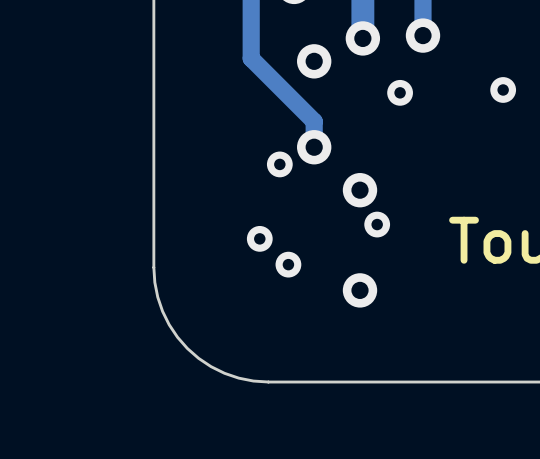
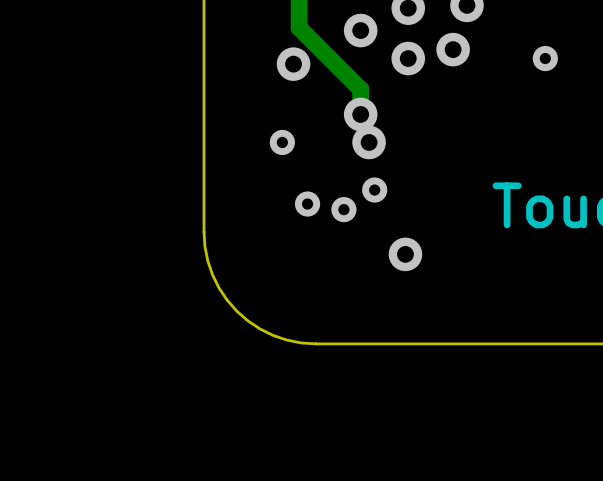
via size: [387, 79, 413, 106] -> [436, 32, 470, 67]
via: none -> (408, 58)
via: none -> (293, 64)
via: (279, 164) -> none
via: none -> (282, 142)
via position: (360, 190) -> (369, 142)
via: none -> (374, 190)
via: (377, 224) -> none
via position: (288, 264) -> (343, 209)

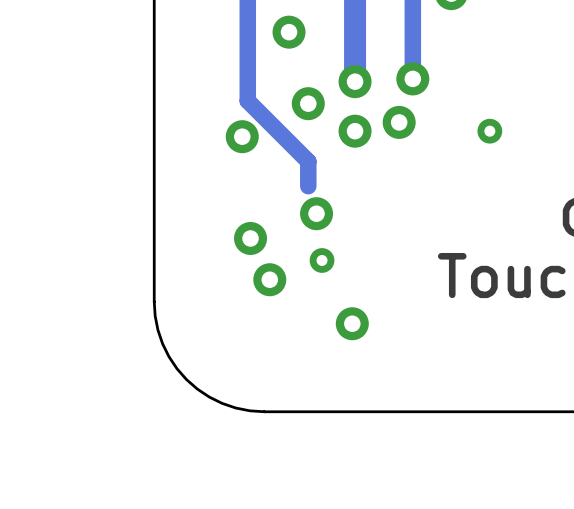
via: (360, 114) -> none
via position: (282, 142) -> (250, 238)
via: (307, 204) -> none
via: none -> (269, 279)
via: (343, 209) -> none

